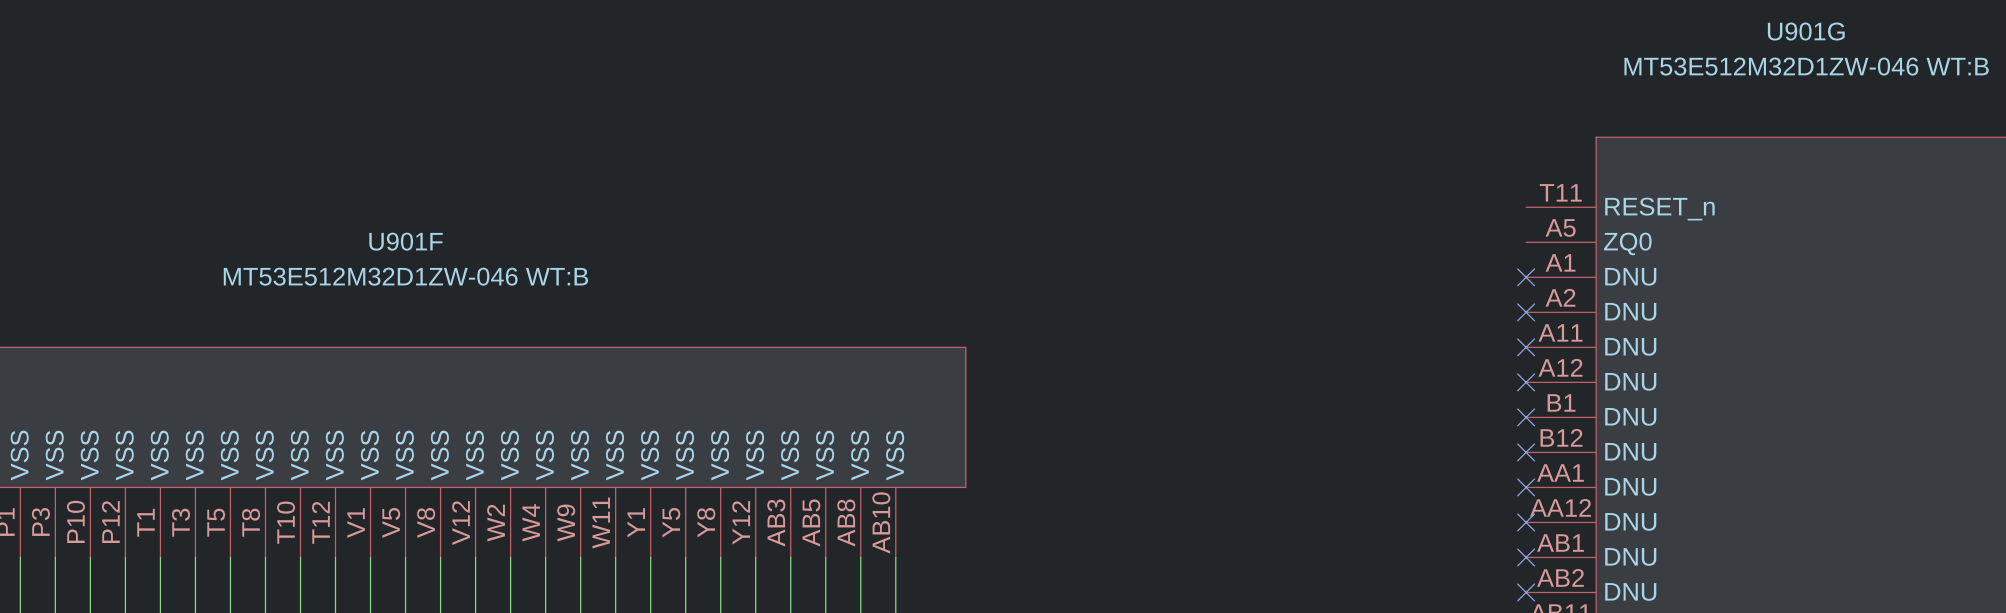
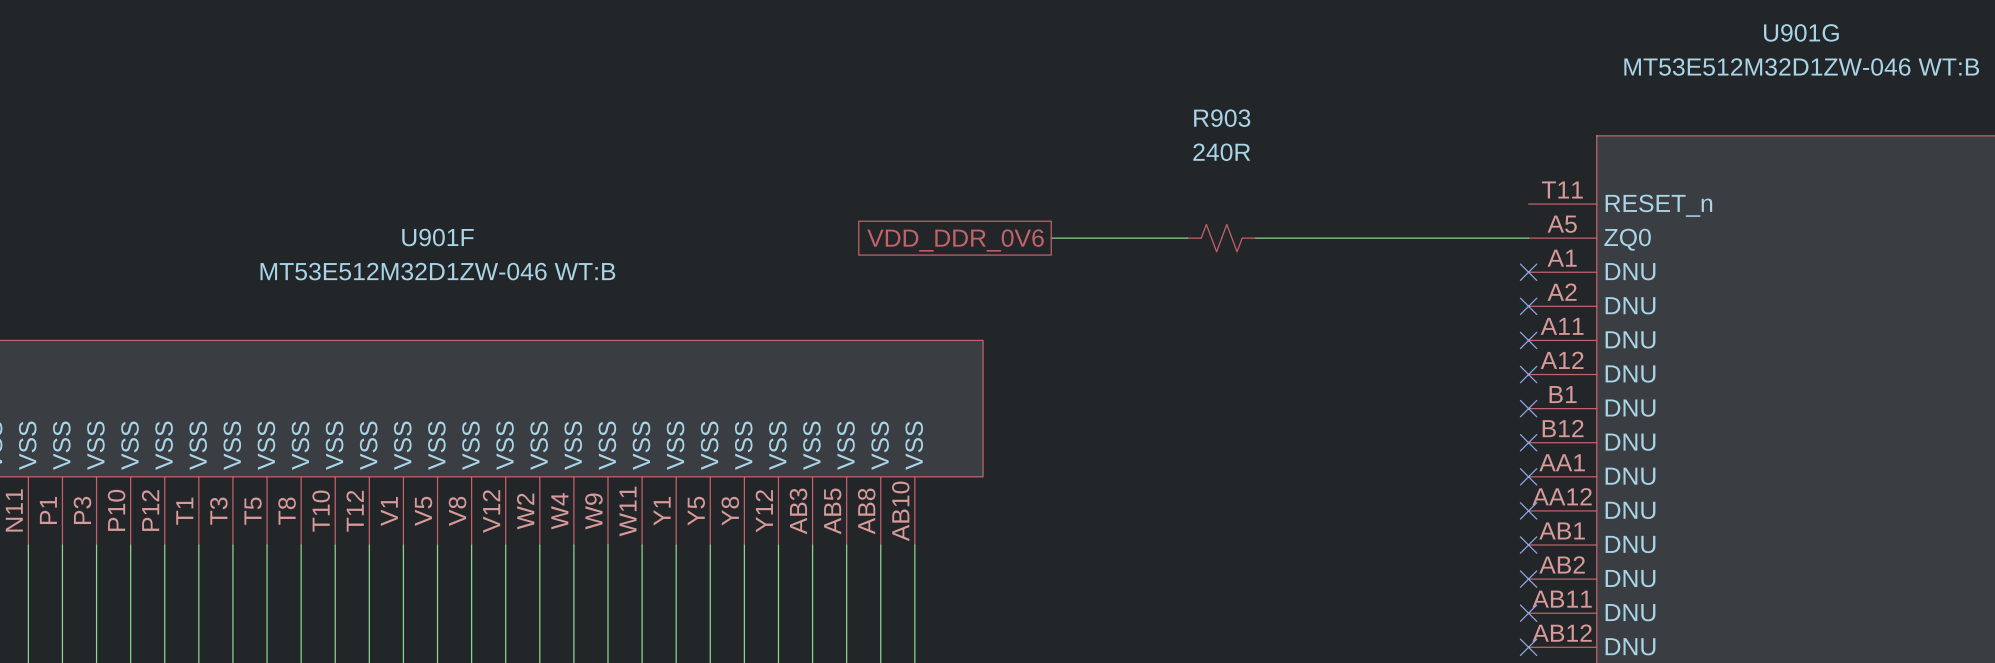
wire: none -> (1051, 238) (1187, 238)
R903: none -> 240R (1221, 238)
wire: none -> (1255, 238) (1528, 238)
global label: none -> VDD_DDR_0V6 (955, 240)

